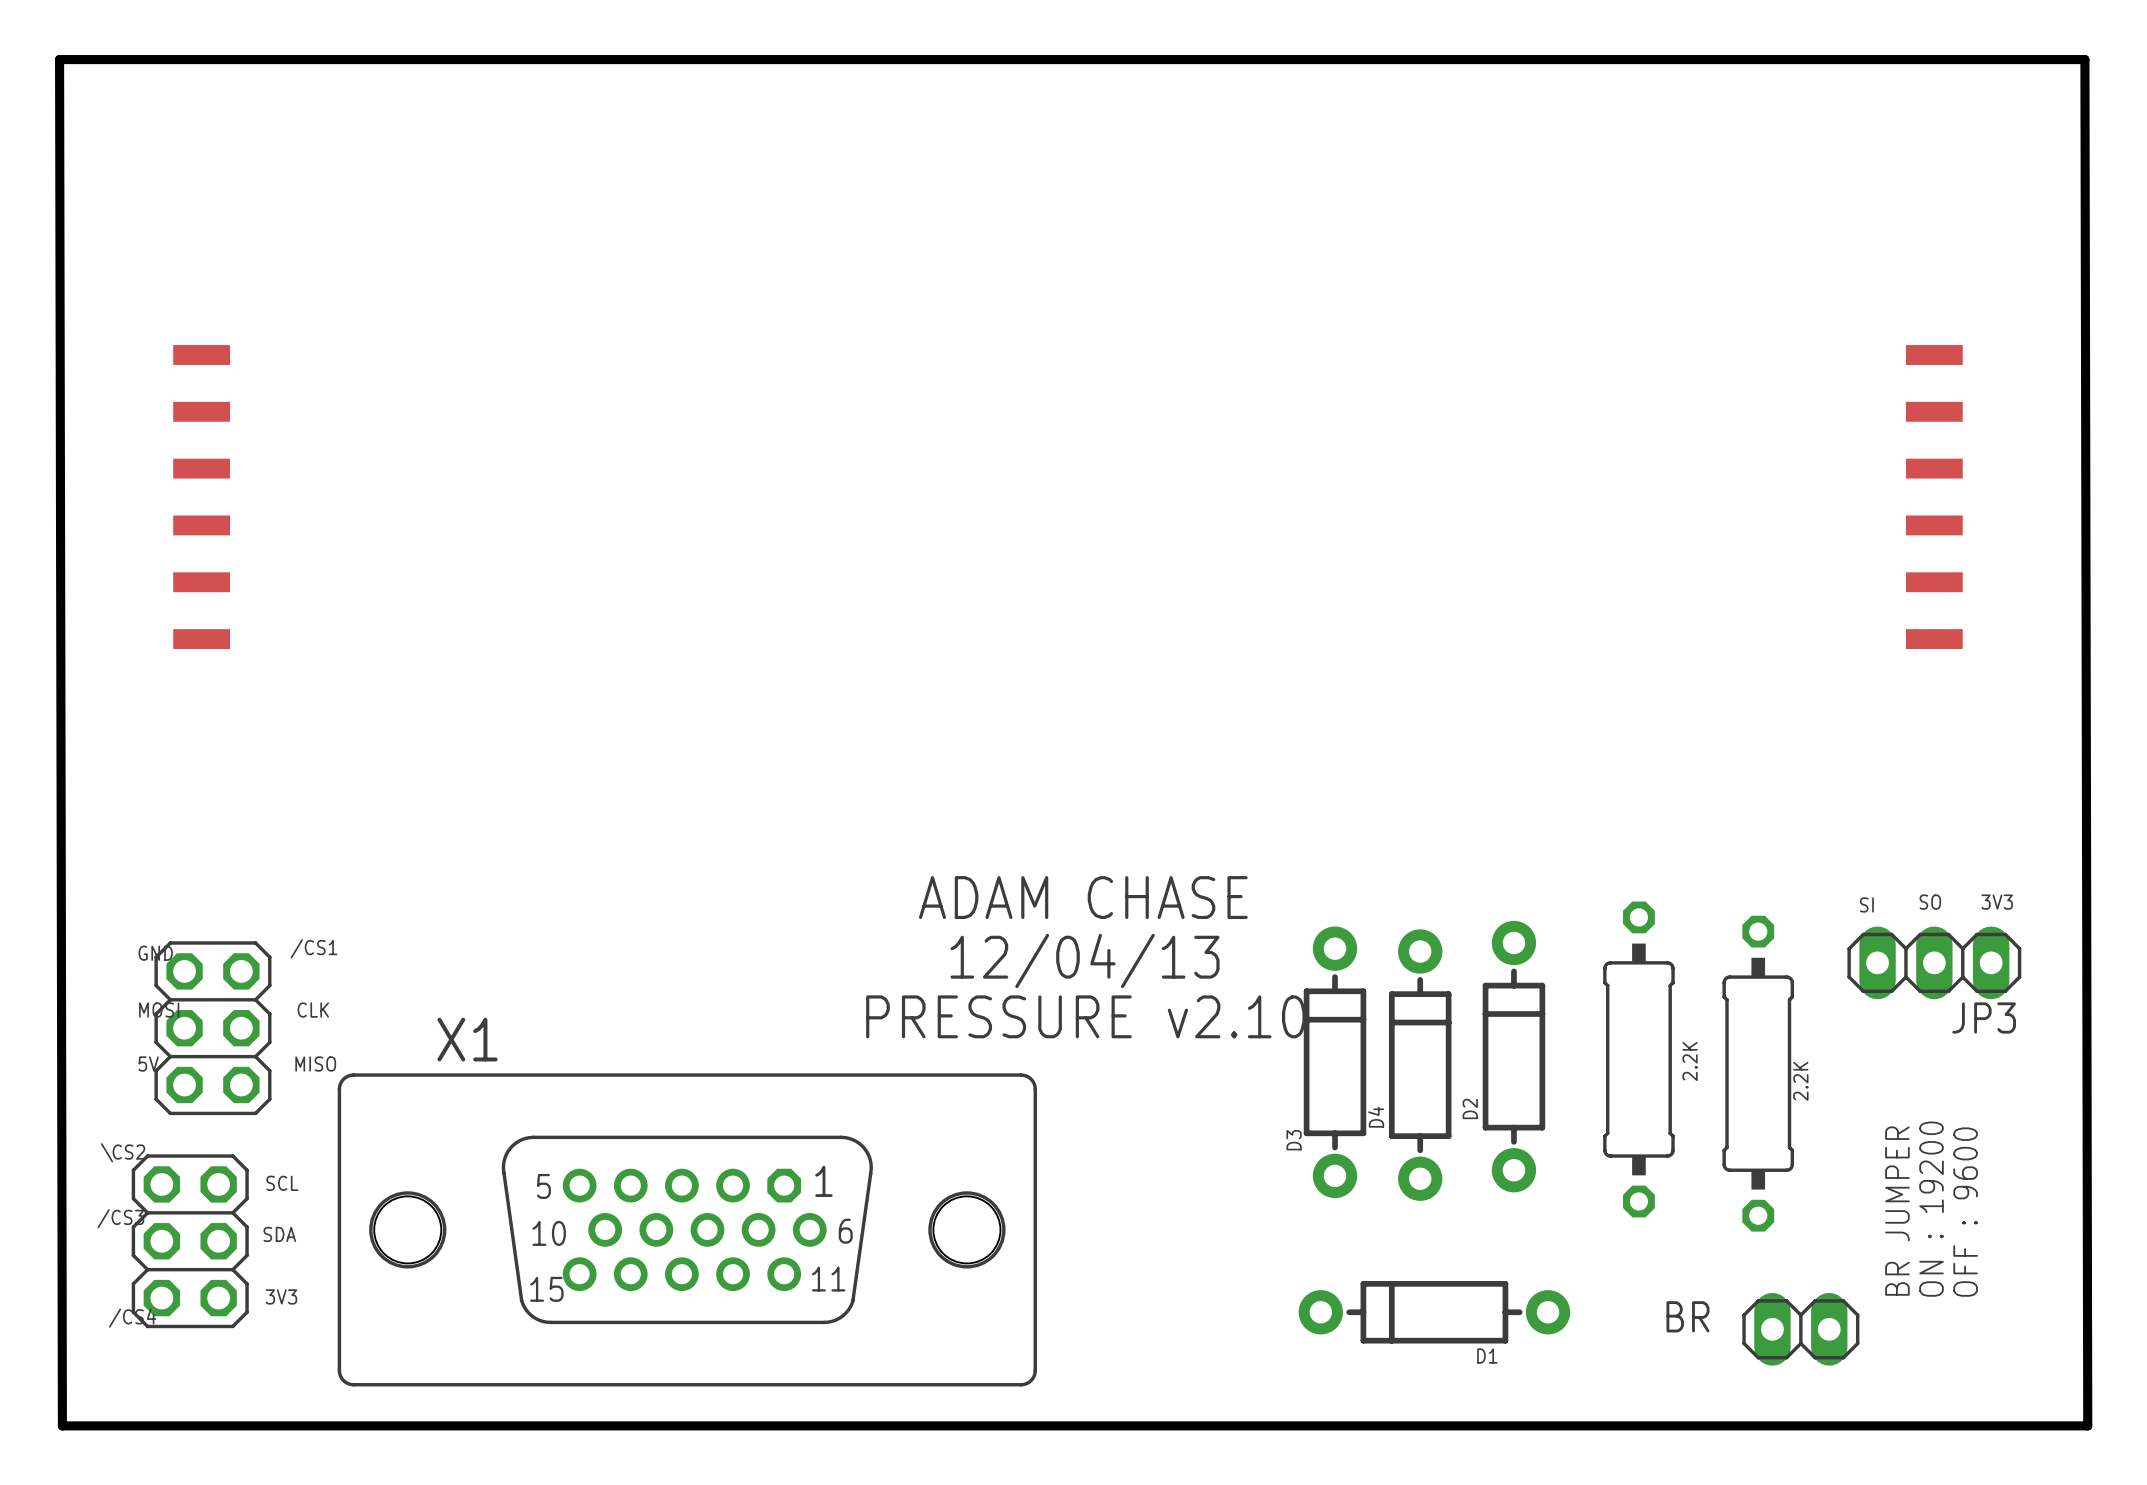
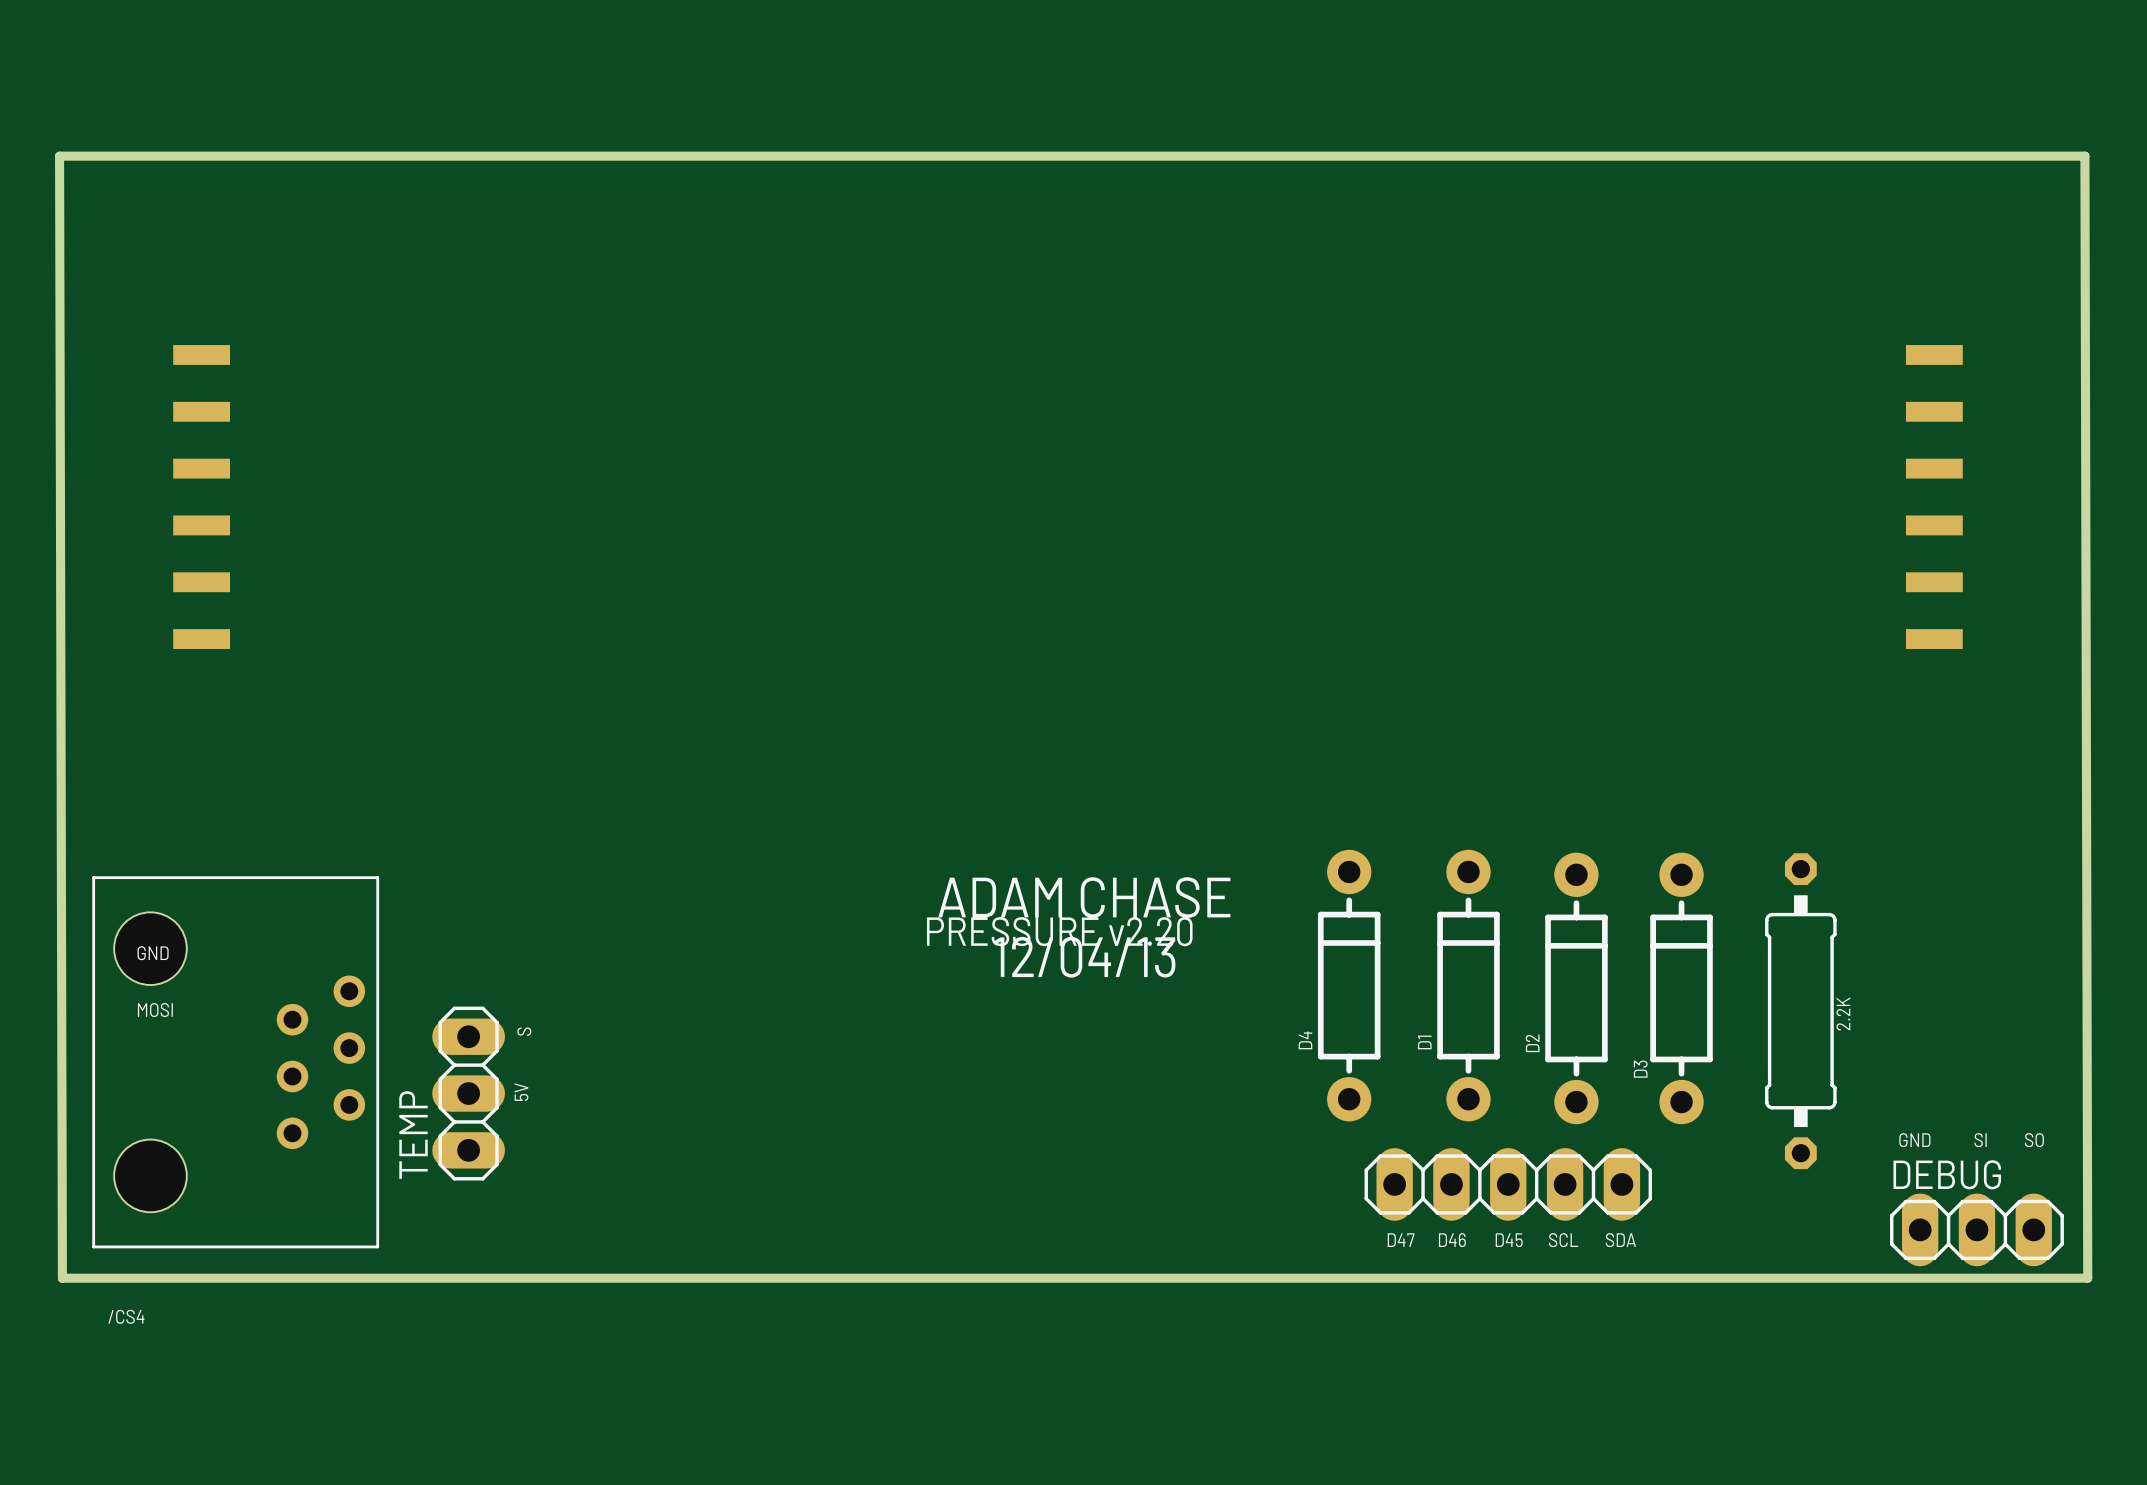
board edge: (59, 59) (62, 1425) (2087, 1425) (2084, 59) (59, 59) -> (59, 156) (62, 1278) (2087, 1278) (2084, 156) (59, 156)
text position: SO (1930, 902) -> SO (2034, 1140)
text: 3V3 (1997, 902) -> none
text position: SI (1866, 904) -> SI (1980, 1140)
text: none -> PRESSURE v2.20 (1059, 931)
text: /CS1 (314, 948) -> none
JP3: (1934, 962) -> none
text: CLK (313, 1010) -> none
text: PRESSURE v2.10 (1085, 1016) -> none
part: (212, 1028) -> none
text: none -> S (524, 1031)
D2 position: (1513, 1056) -> (1576, 988)
part: 2.2K (1638, 1059) -> none
part: none -> (235, 1062)
D3 position: (1334, 1062) -> (1681, 988)
text rotation: 0° (148, 1064) -> 90° counterclockwise (521, 1092)
text position: 5V (148, 1064) -> 5V (521, 1092)
text: MISO (315, 1064) -> none
D4 position: (1420, 1065) -> (1349, 985)
part position: (1758, 1073) -> (1800, 1011)
TEMP: none -> (468, 1093)
text: none -> GND (1914, 1140)
text: \CS2 (123, 1152) -> none
text: SCL (282, 1183) -> none
part: none -> (1508, 1184)
text: ON : 19200 (1931, 1209) -> none
text: BR JUMPER (1897, 1211) -> none
text: OFF : 9600 (1965, 1212) -> none
text: /CS3 (120, 1218) -> none
X1: (687, 1229) -> none
DEBUG: none -> (1976, 1229)
text: SDA (279, 1234) -> none
text: none -> D47 (1401, 1240)
text: none -> D46 (1452, 1240)
text: none -> D45 (1509, 1240)
text: none -> SCL (1563, 1240)
text: none -> SDA (1620, 1240)
part: (190, 1241) -> none
text: 3V3 (281, 1296) -> none
D1 rotation: 0° (1434, 1312) -> 90° clockwise (1468, 985)
D1 position: (1434, 1312) -> (1468, 985)
BR: (1800, 1329) -> none

